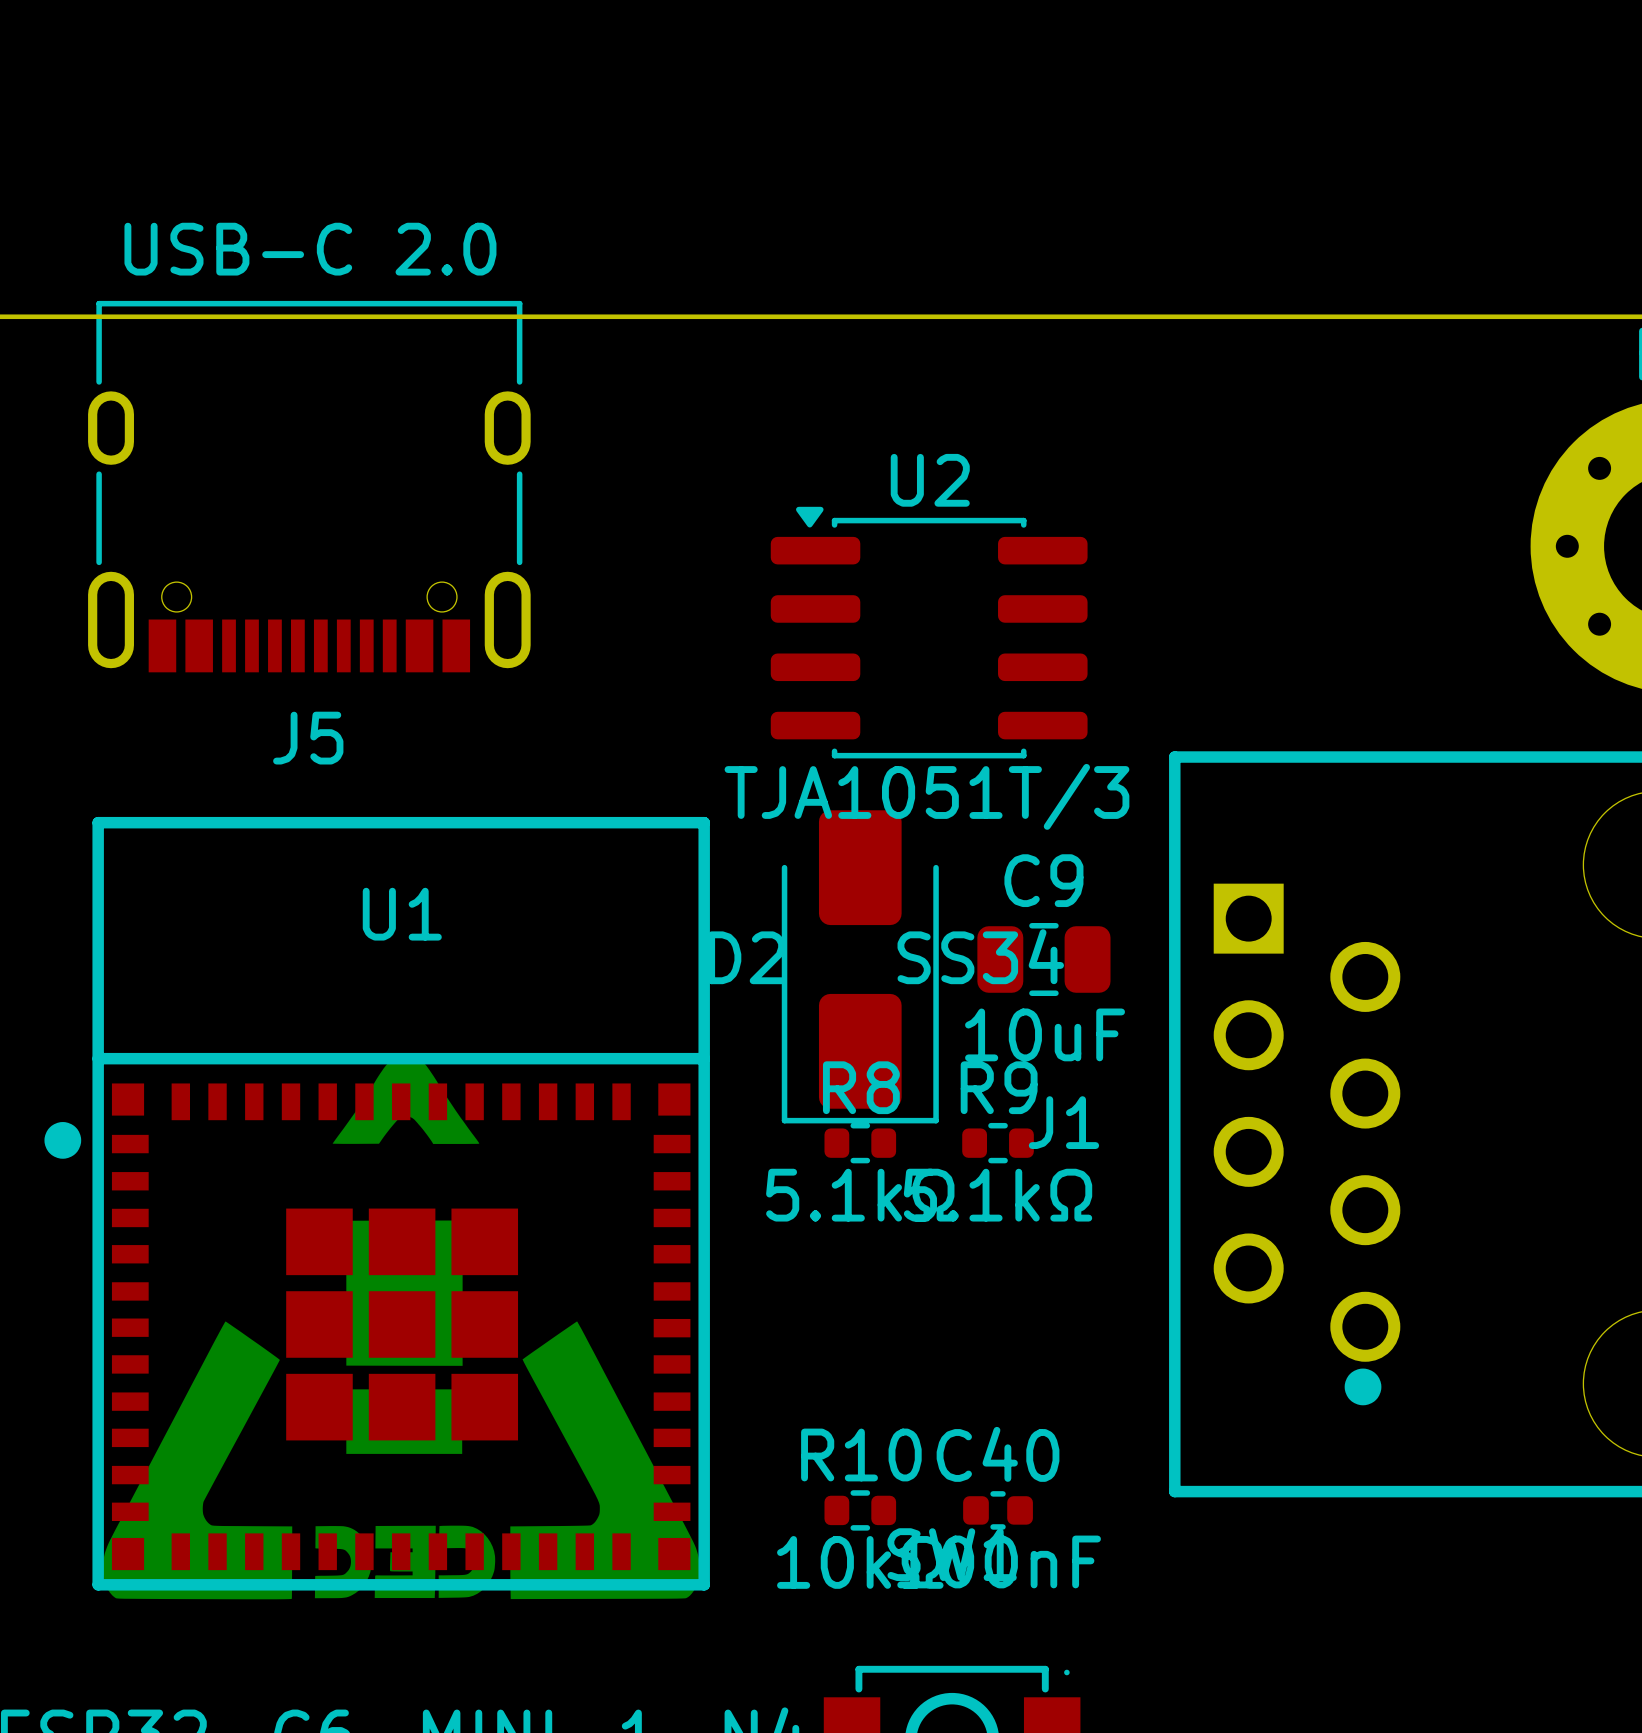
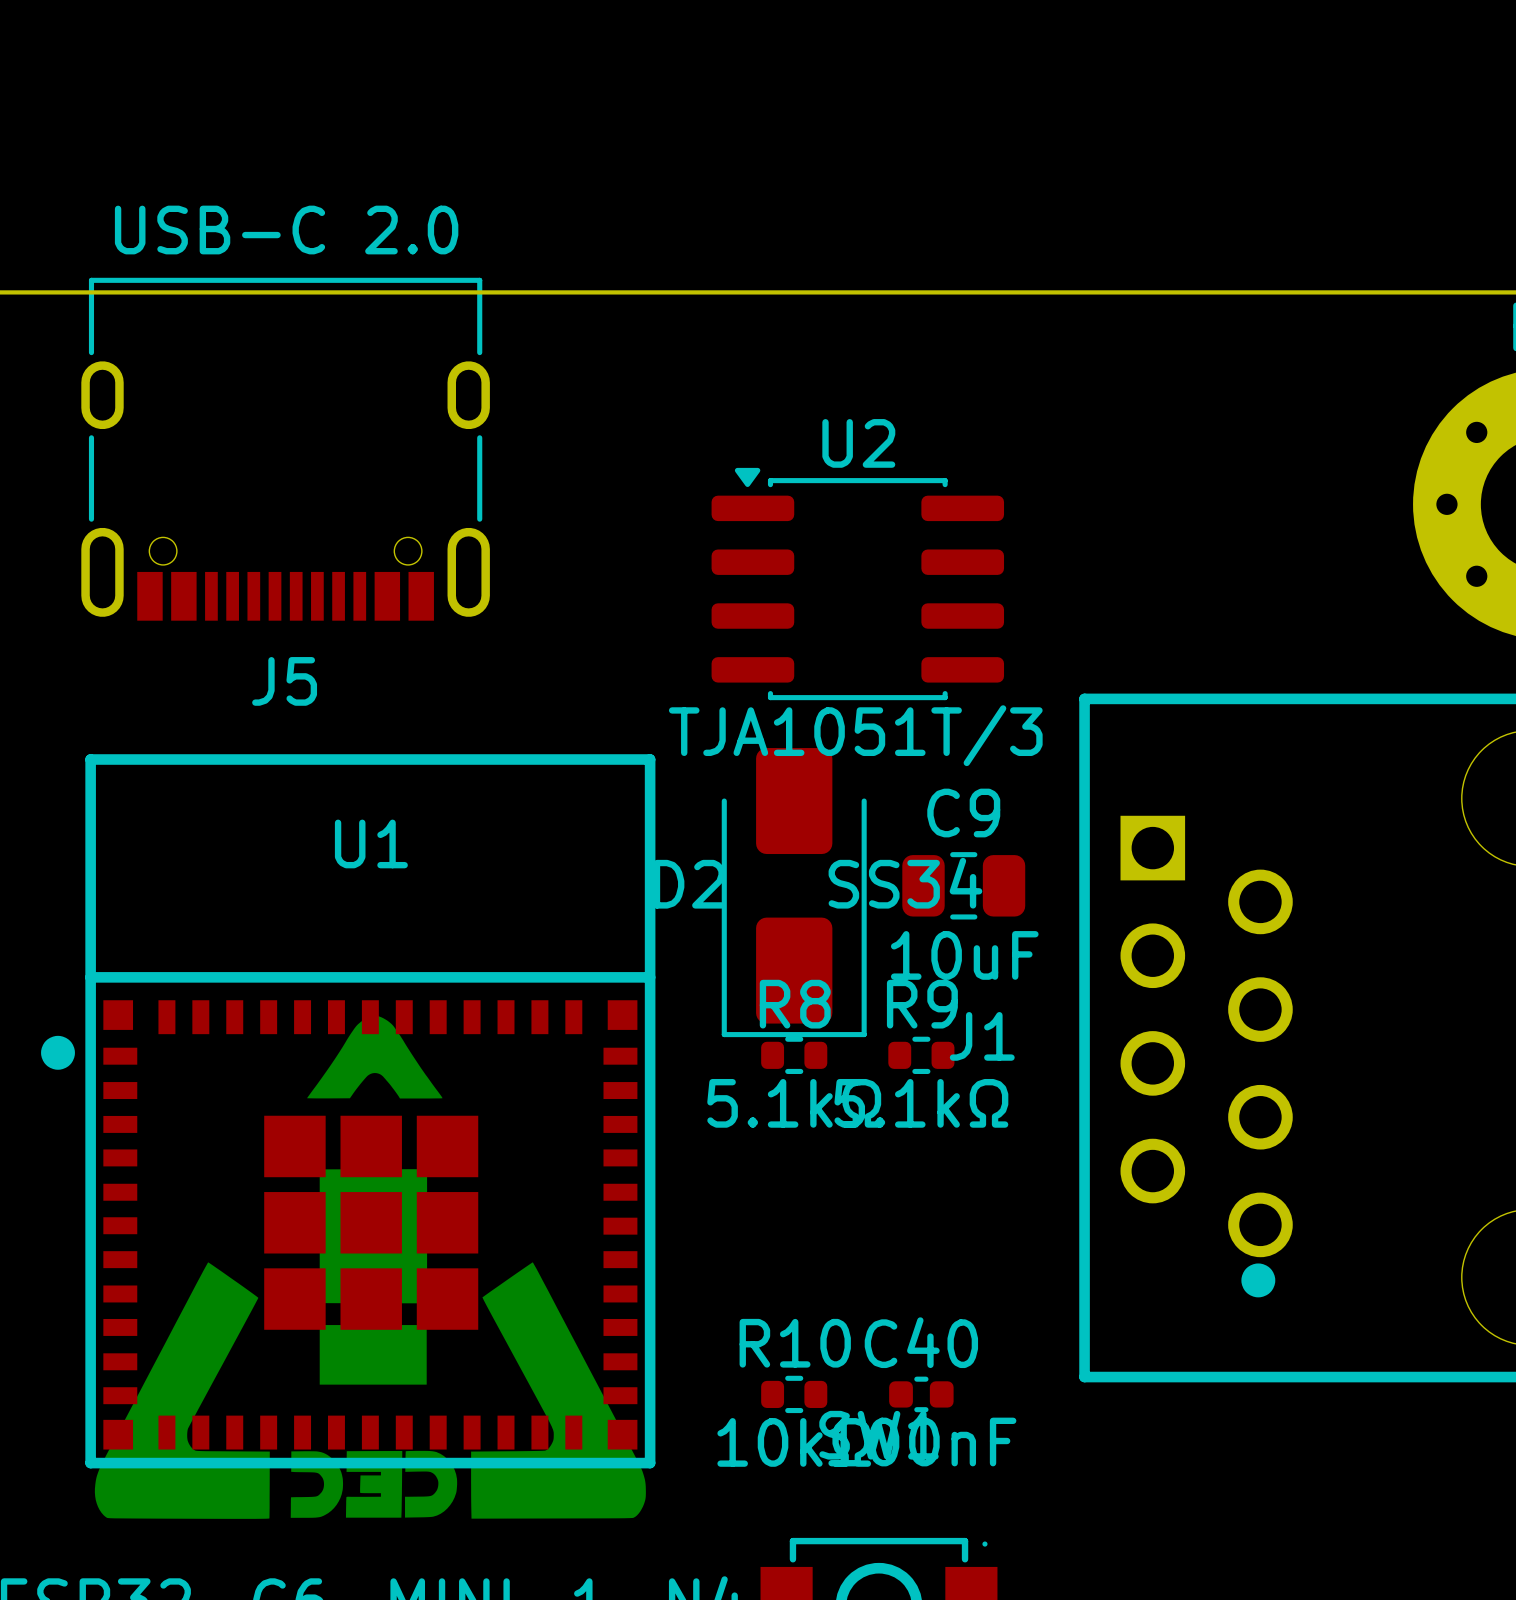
drawing position: (401, 1326) -> (370, 1267)

